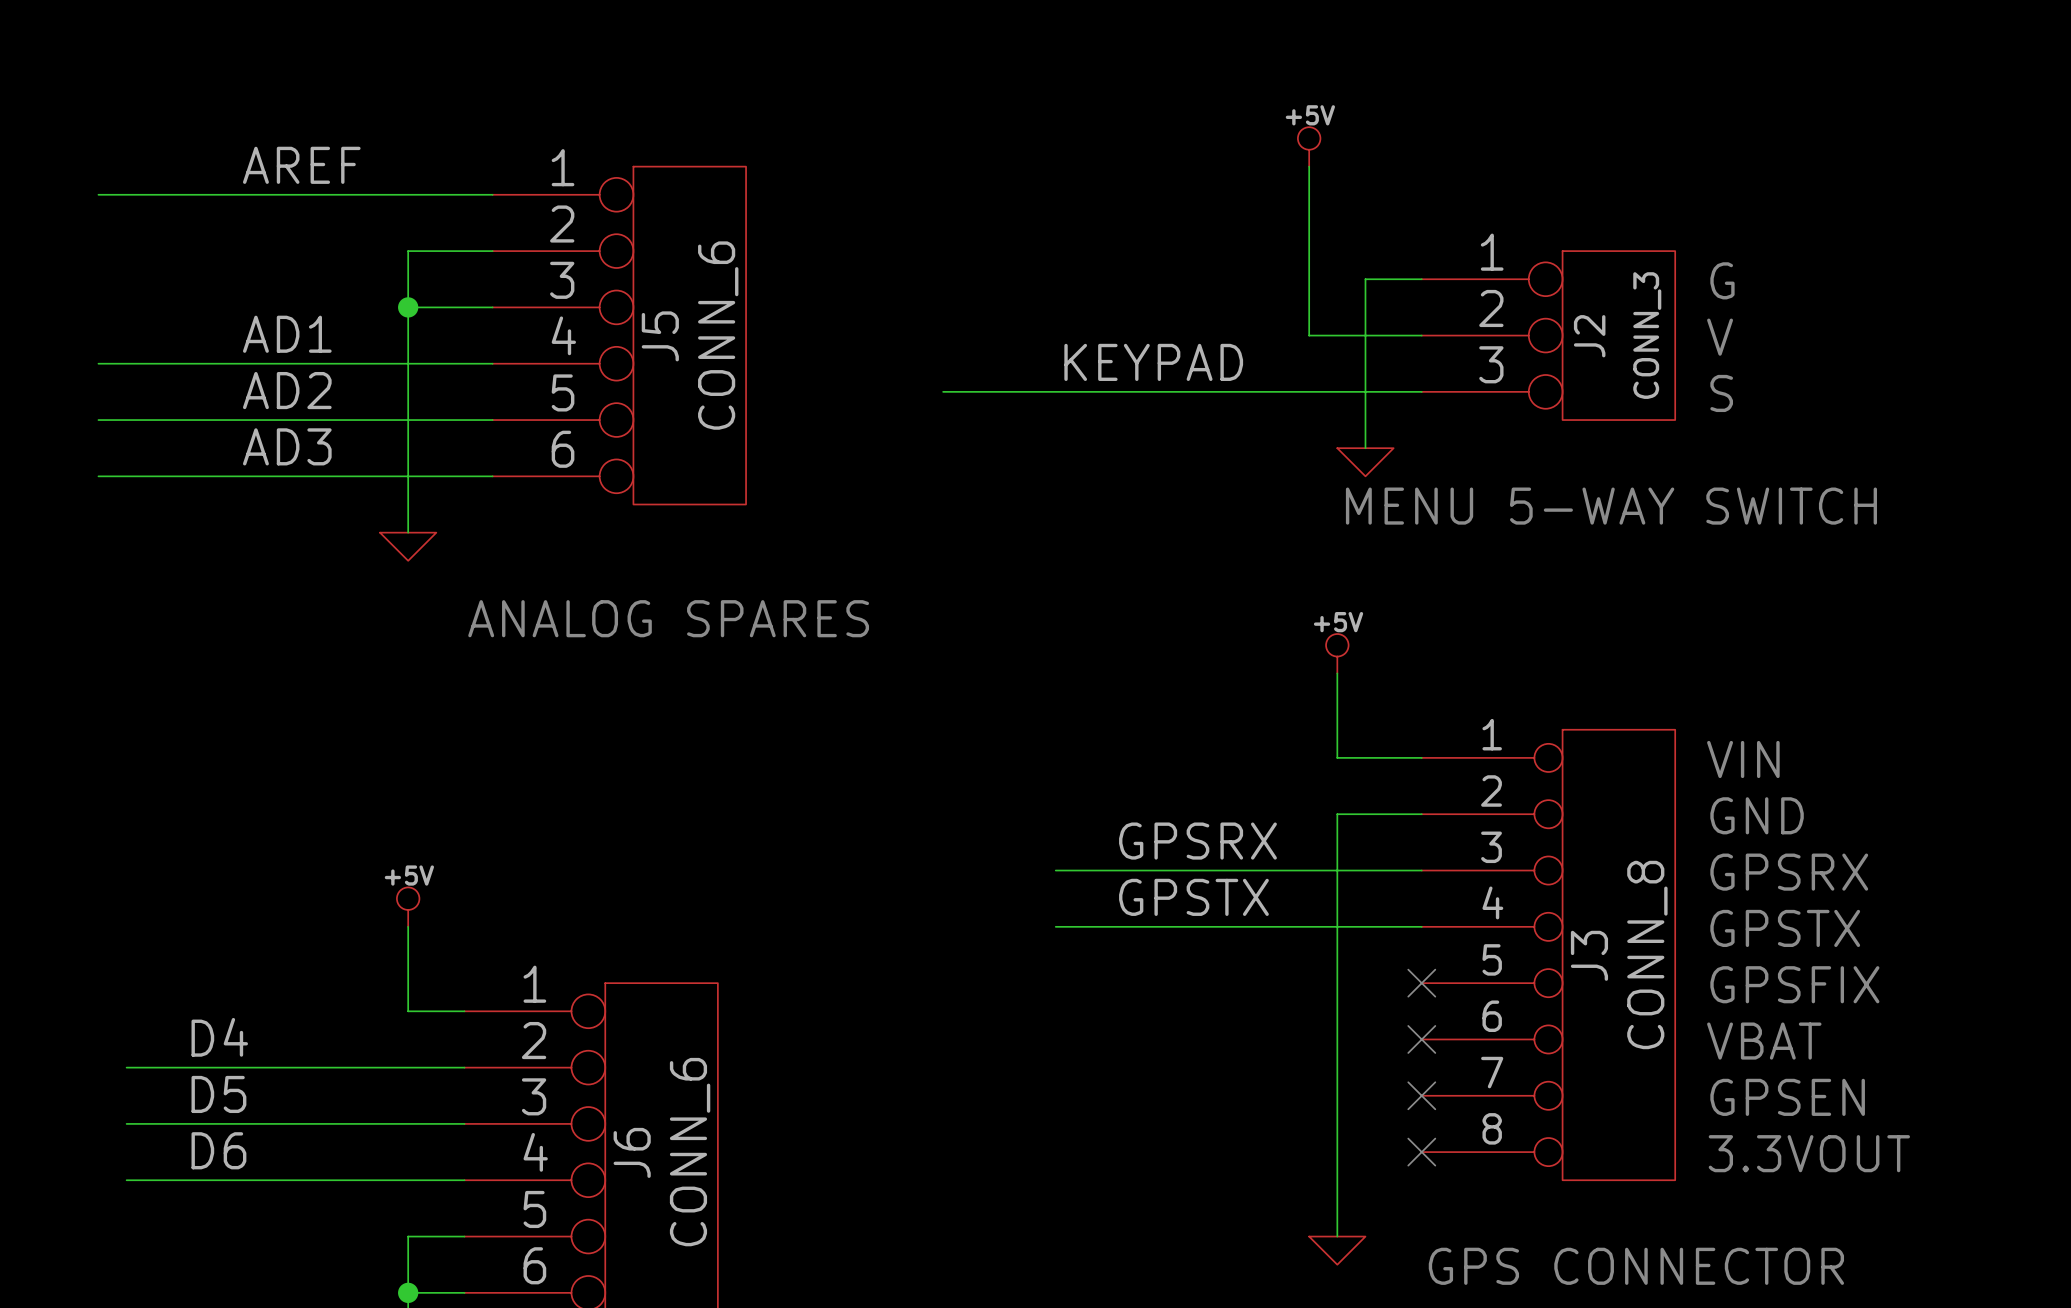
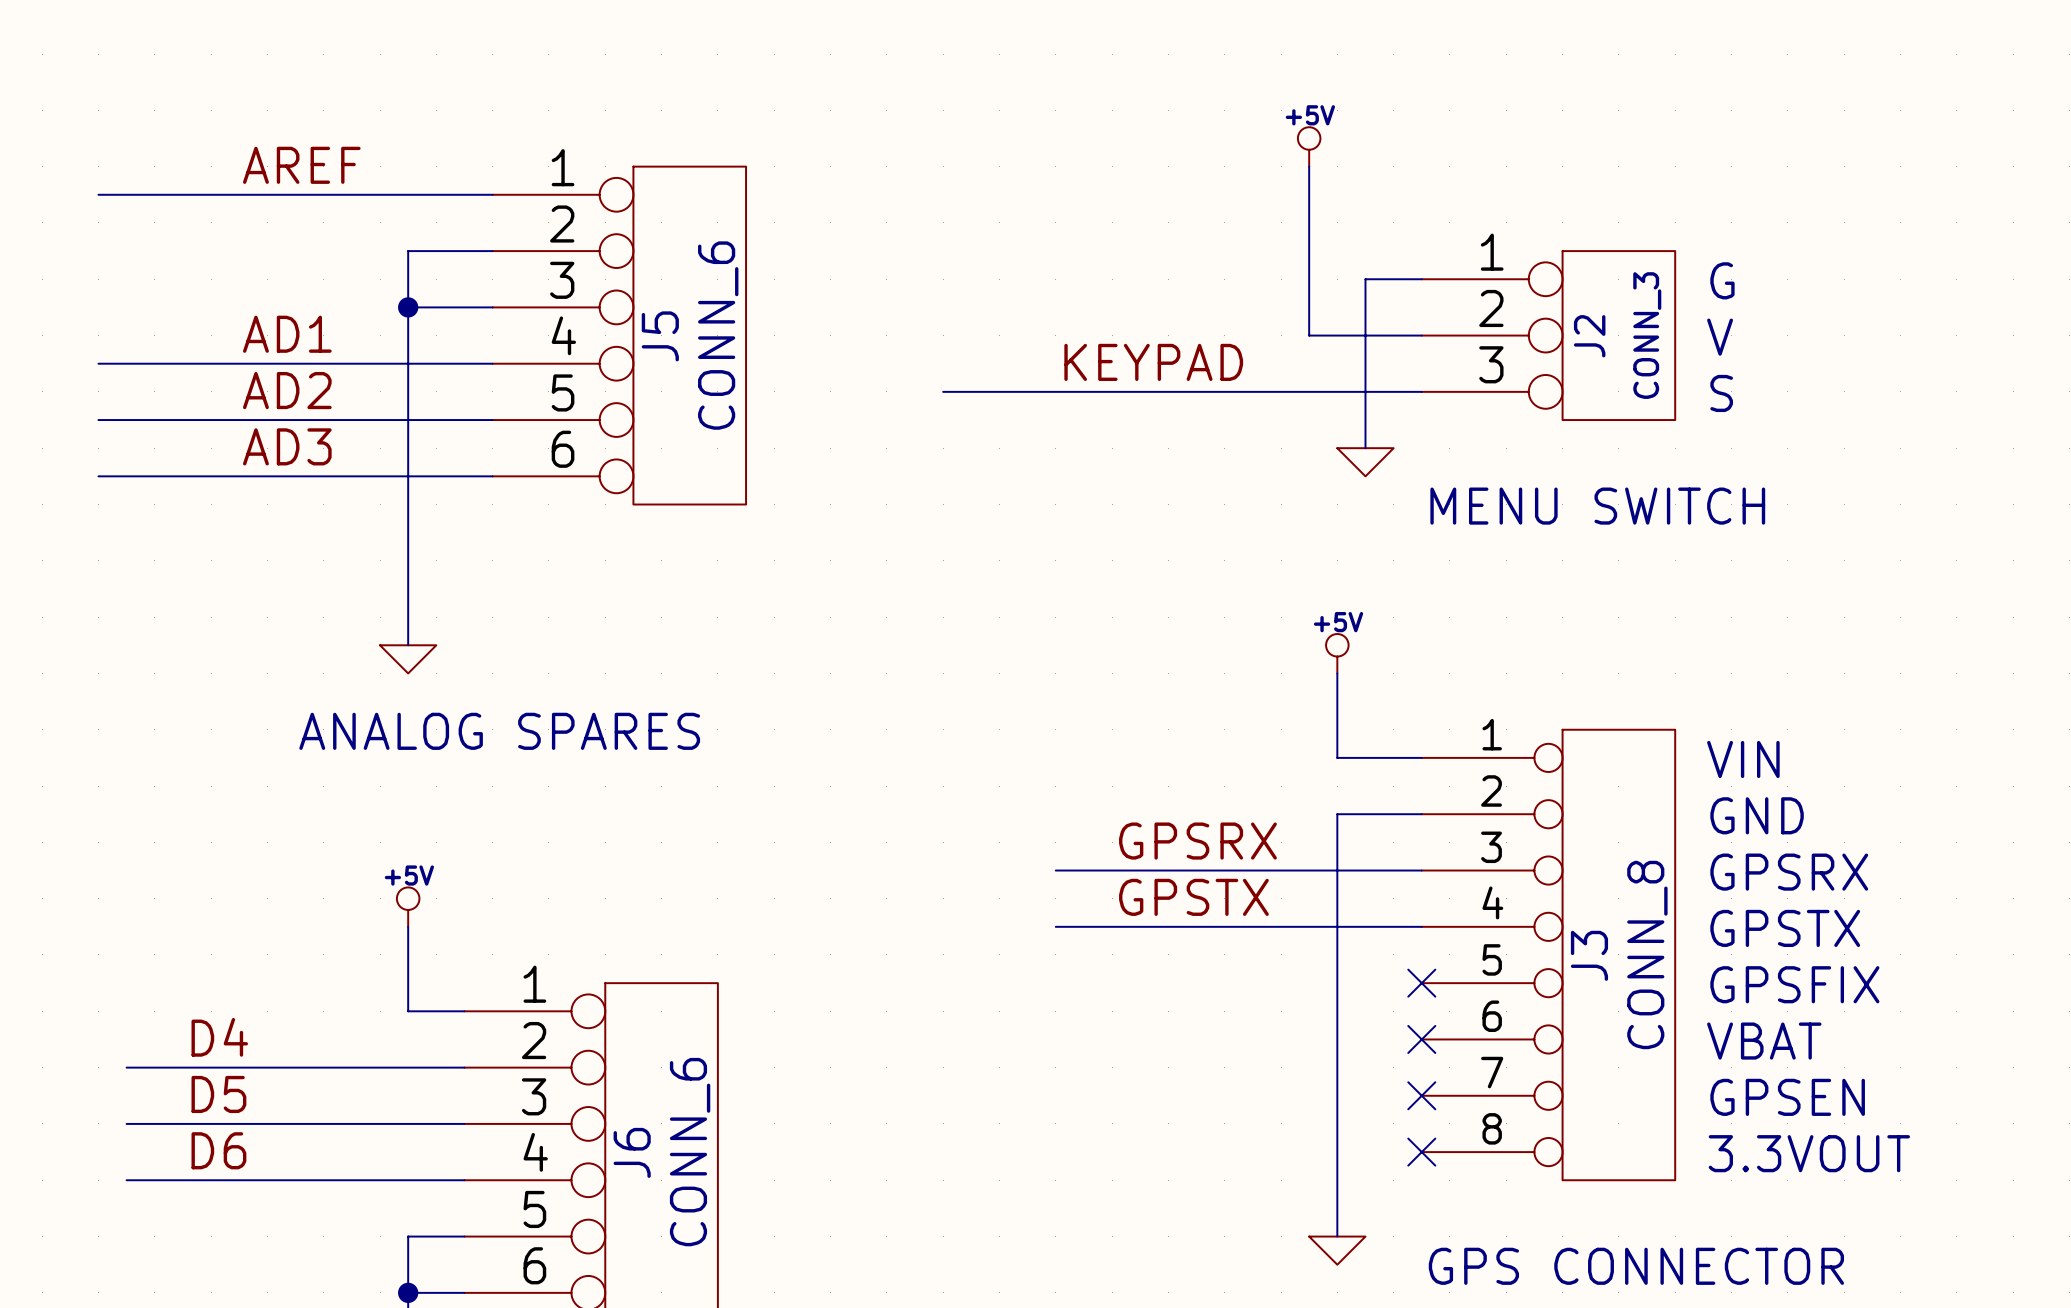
text: MENU 5-WAY SWITCH (1611, 506) -> MENU SWITCH (1597, 506)
wire: none -> (408, 532) (408, 645)
power symbol position: (408, 546) -> (408, 659)
text position: ANALOG SPARES (668, 618) -> ANALOG SPARES (499, 731)

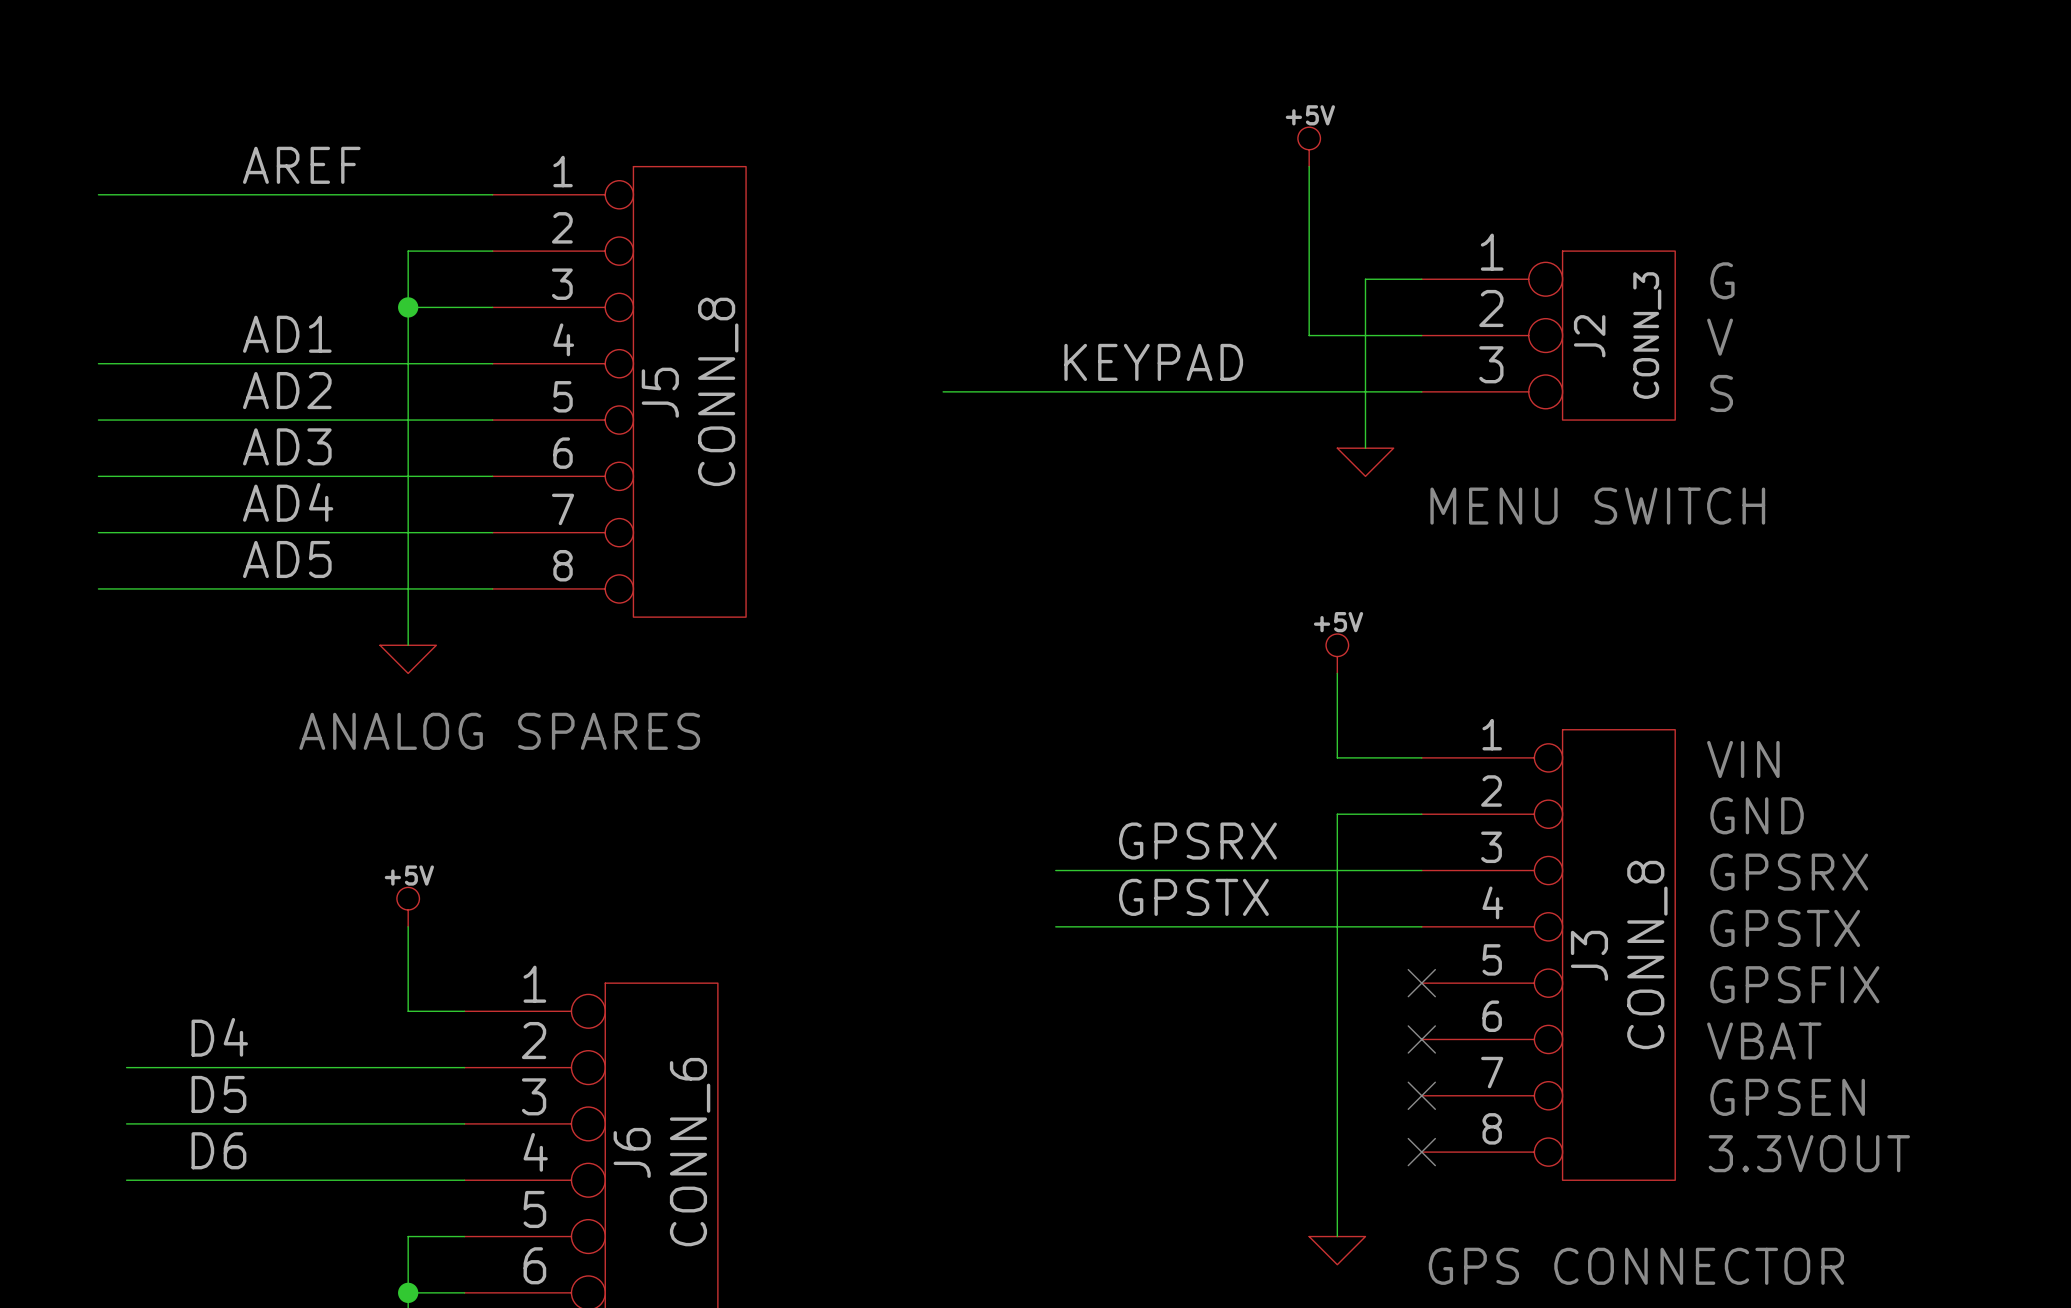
J5 symbol: [492, 166, 747, 505] -> [492, 166, 747, 618]
J5 value: CONN_6 (718, 335) -> CONN_8 (718, 391)
label: none -> AD4 (288, 502)
wire: none -> (98, 532) (492, 532)
label: none -> AD5 (287, 559)
wire: none -> (98, 588) (492, 588)

